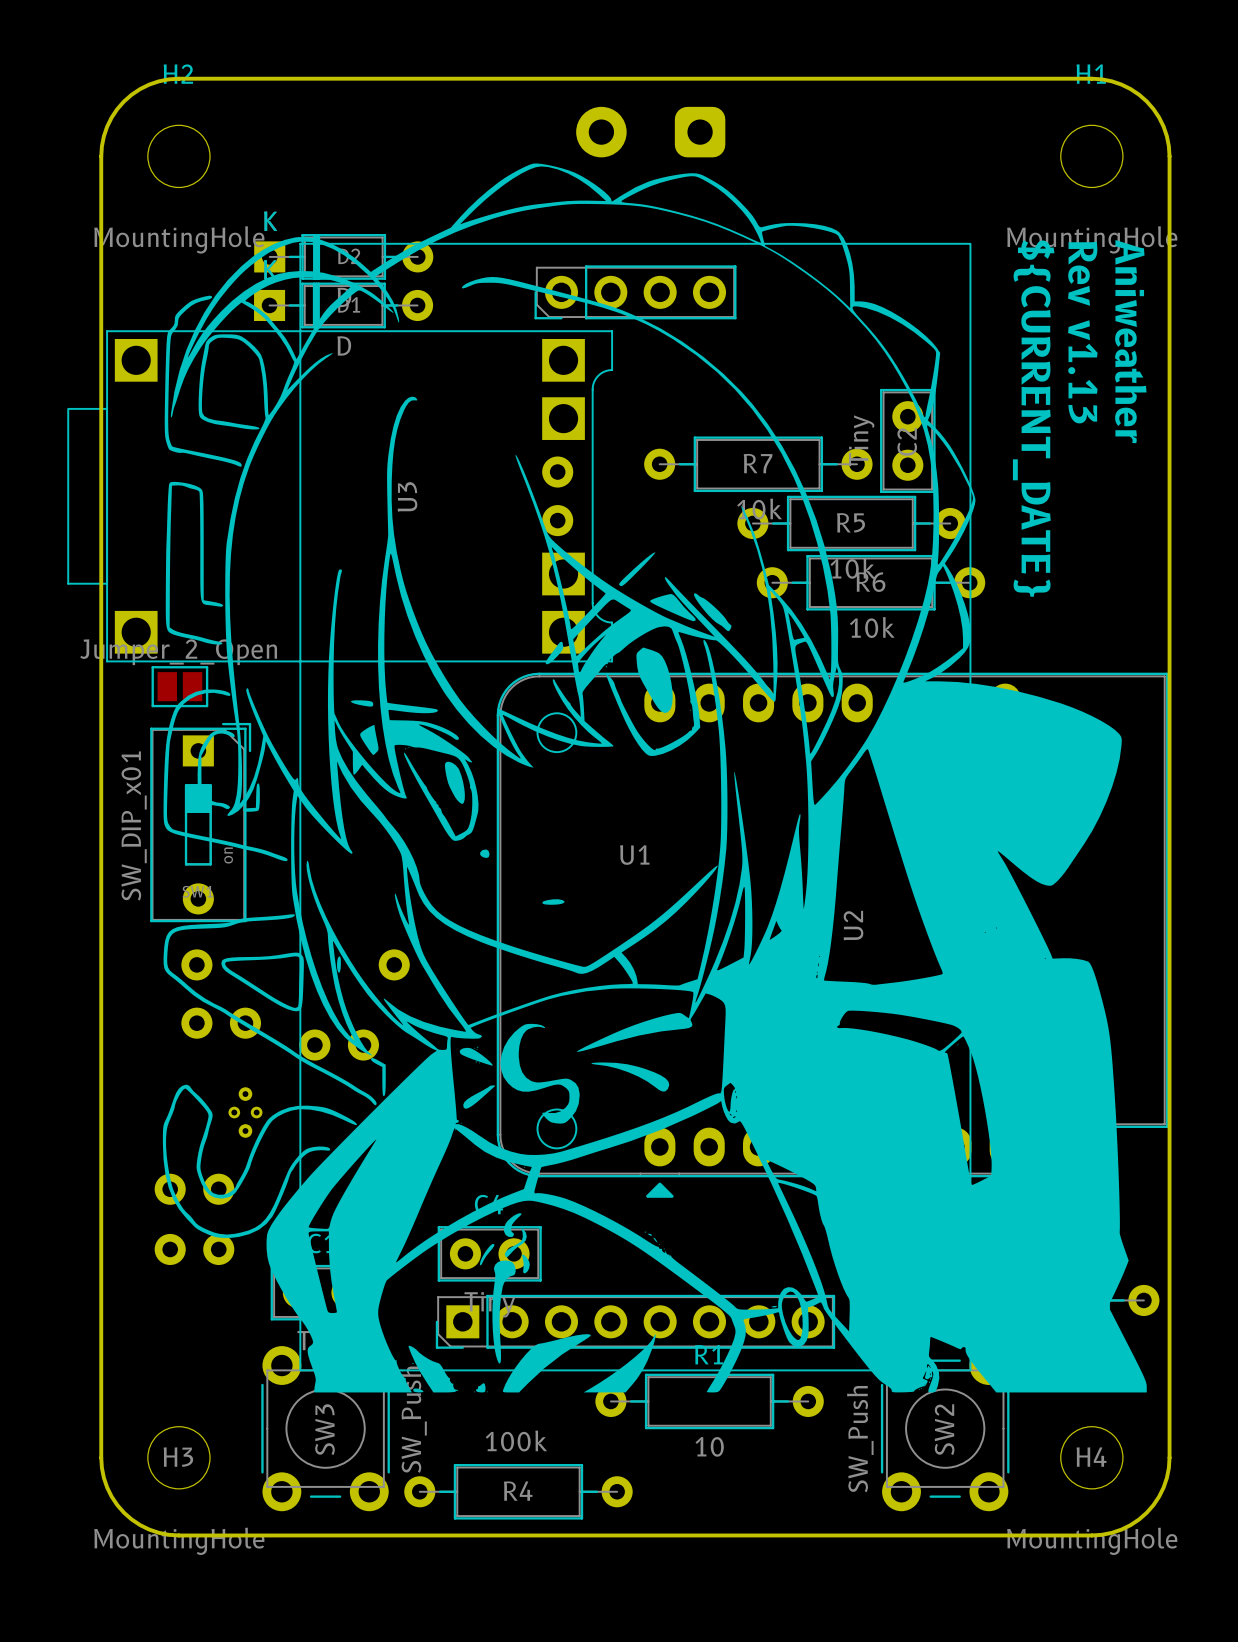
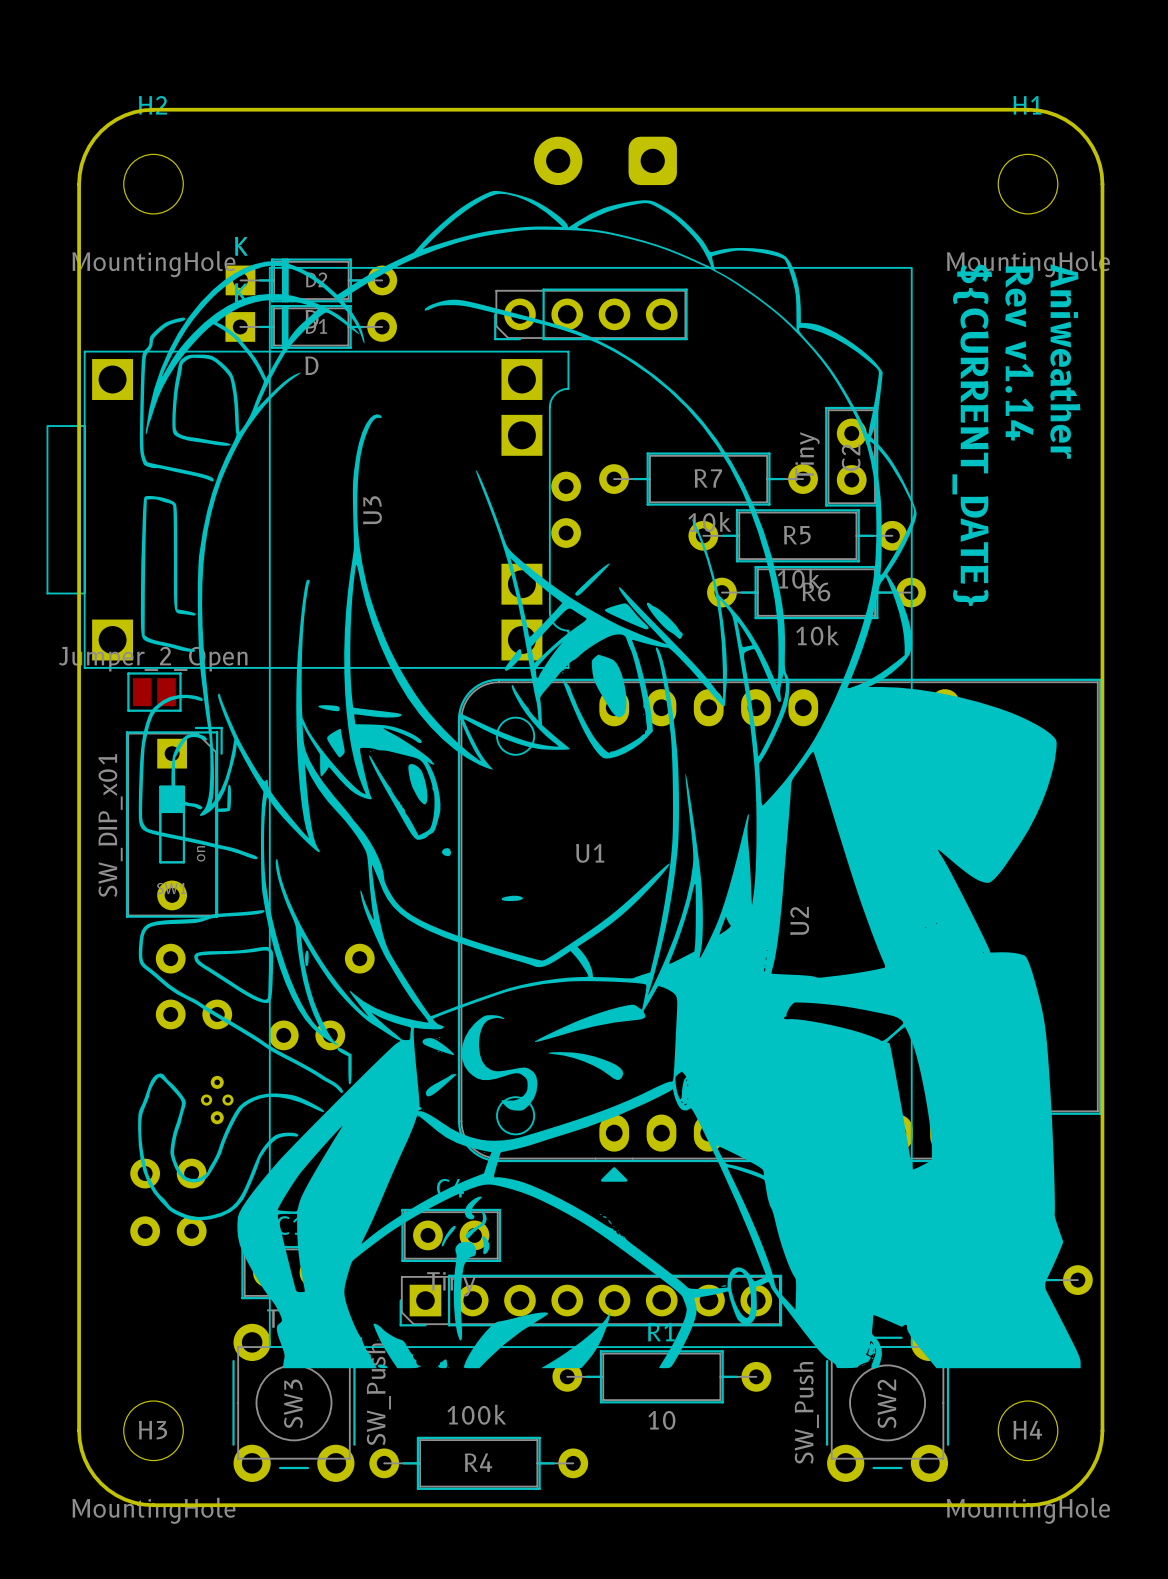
text: Rev v1.13 (1082, 332) -> Rev v1.14 (1019, 353)
part position: (557, 496) -> (566, 509)

